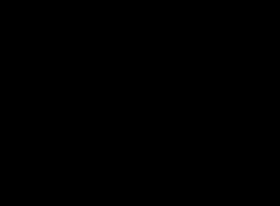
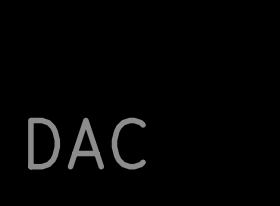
text: none -> DAC (87, 143)

